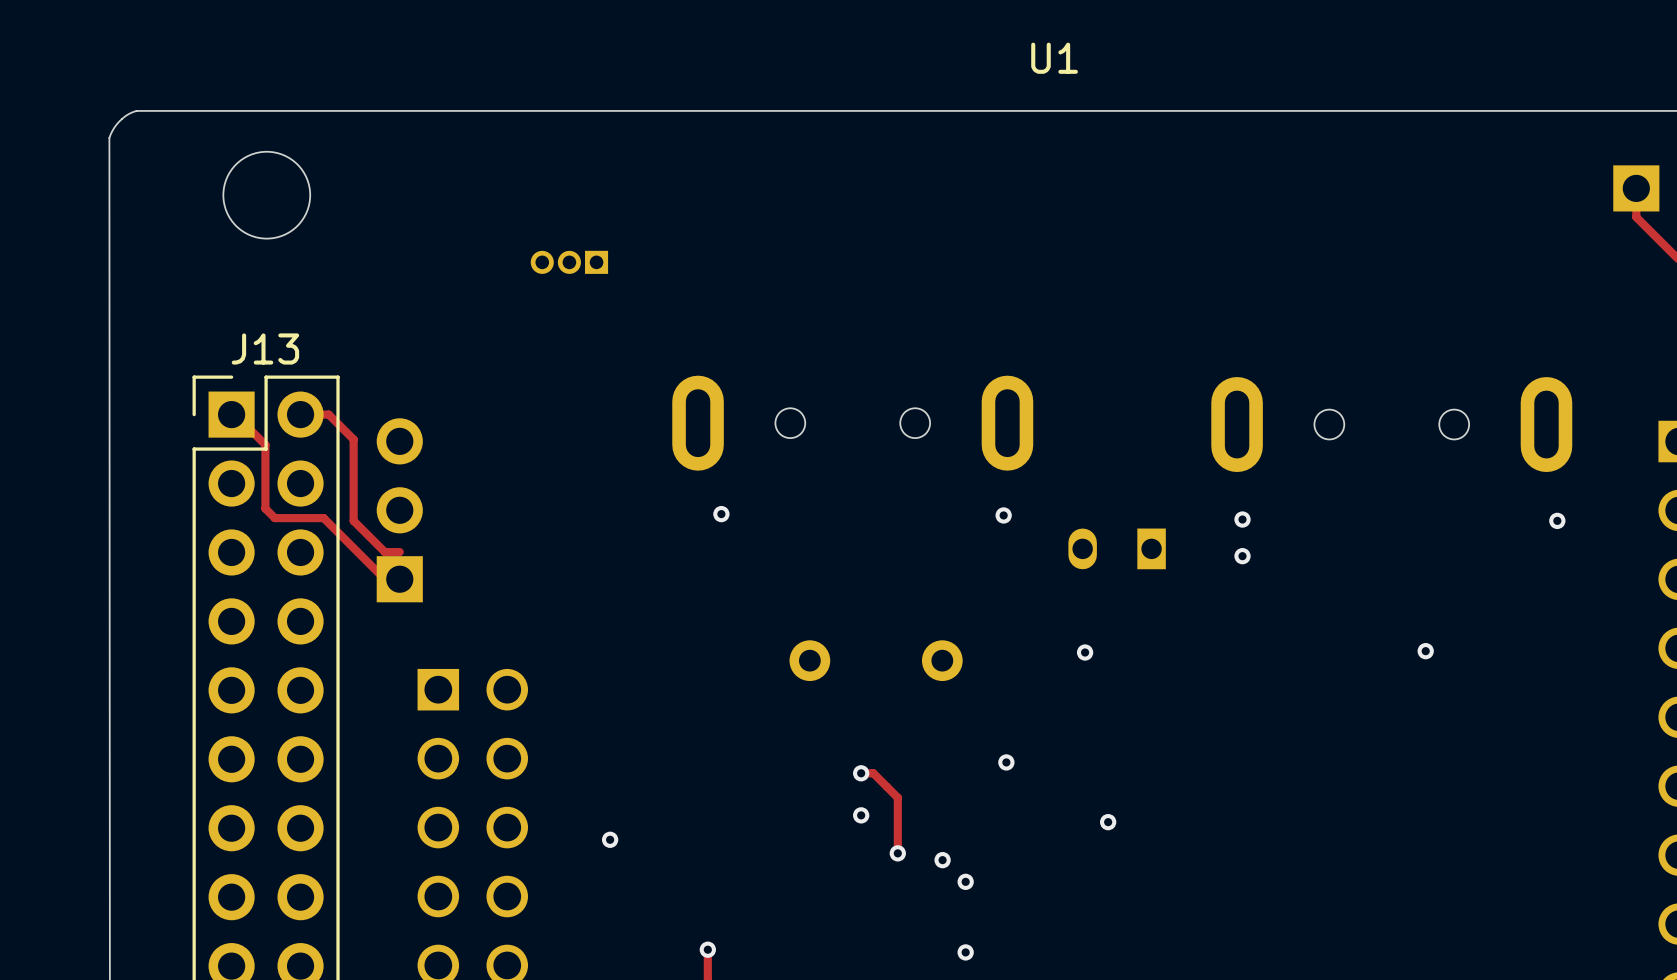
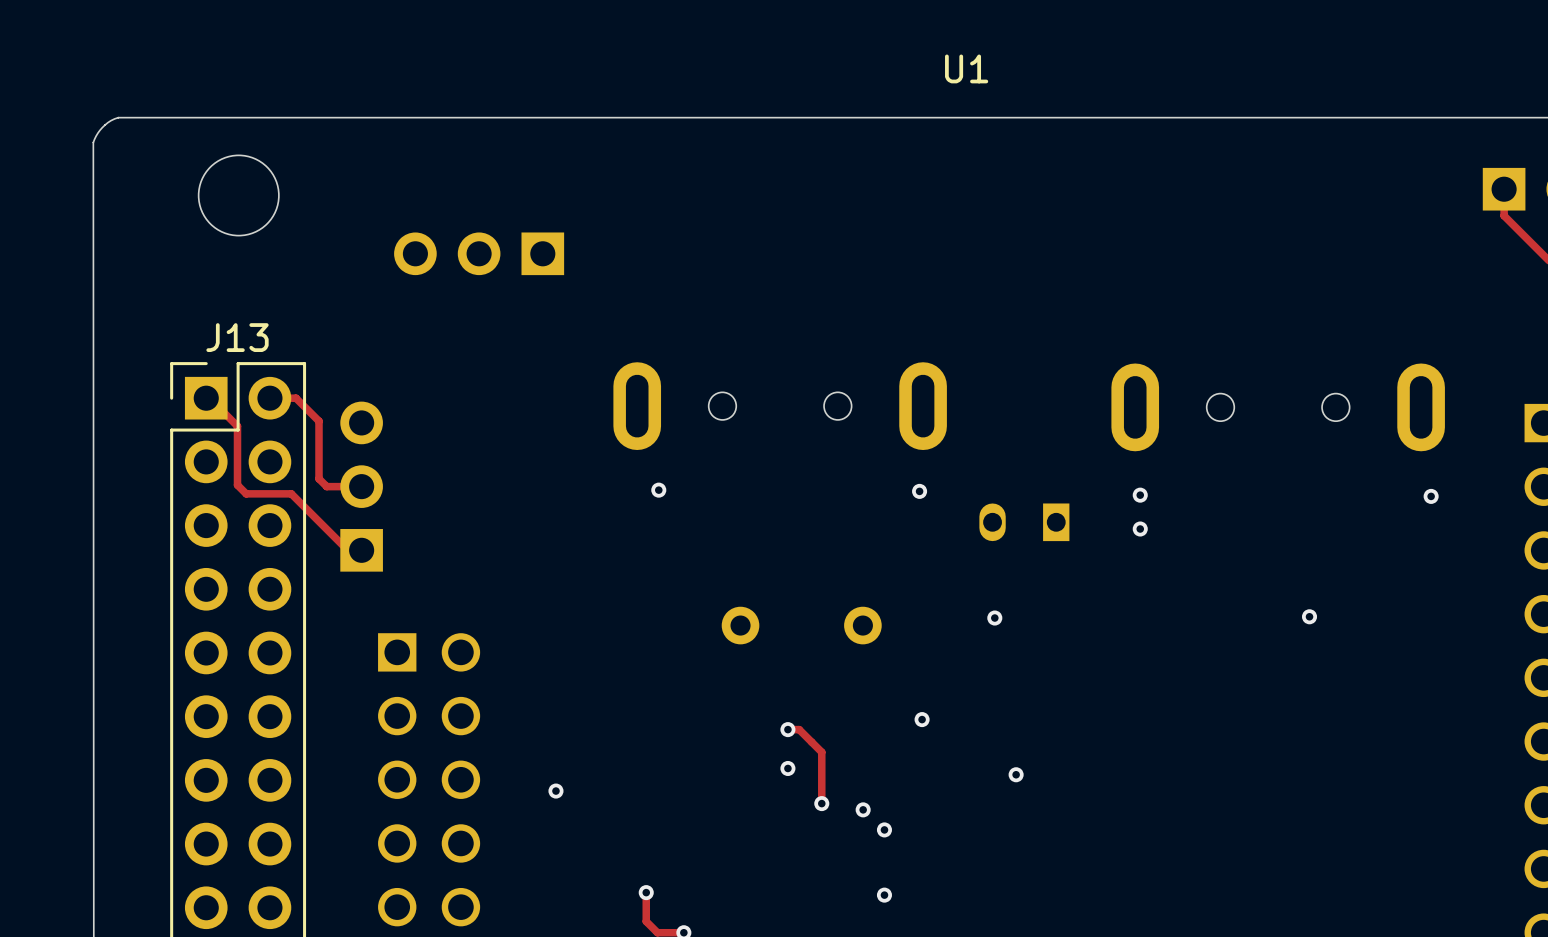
part: none -> (479, 253)
part: (569, 262) -> none
track: (353, 501) (353, 520) (384, 552) (399, 552) -> (319, 478) (326, 486) (361, 486)

